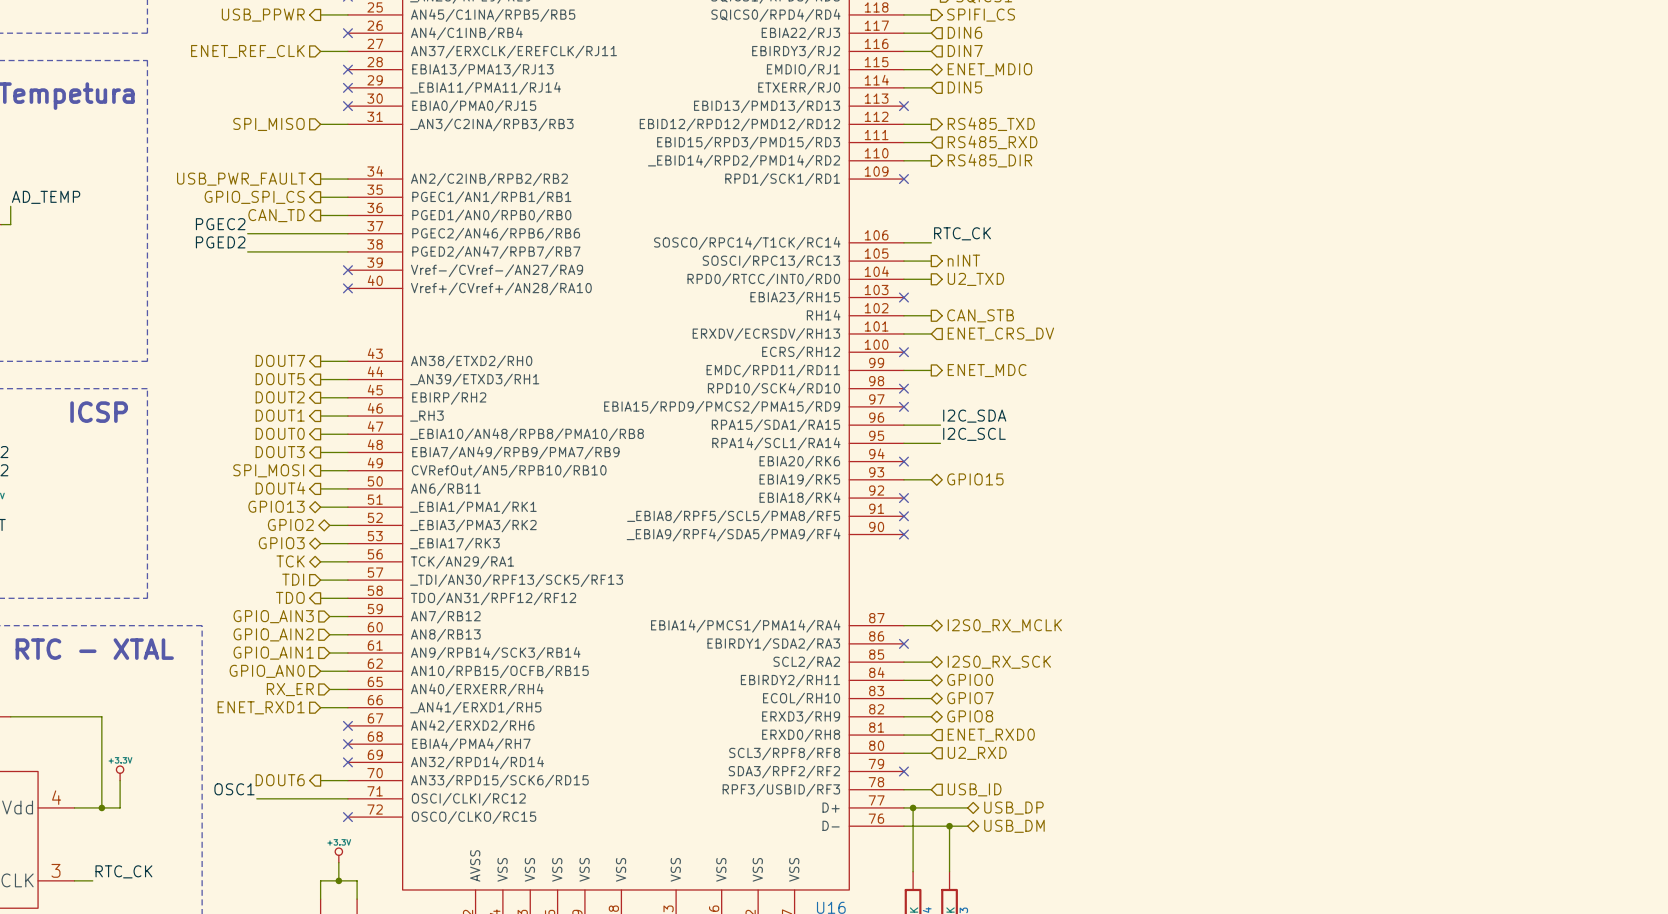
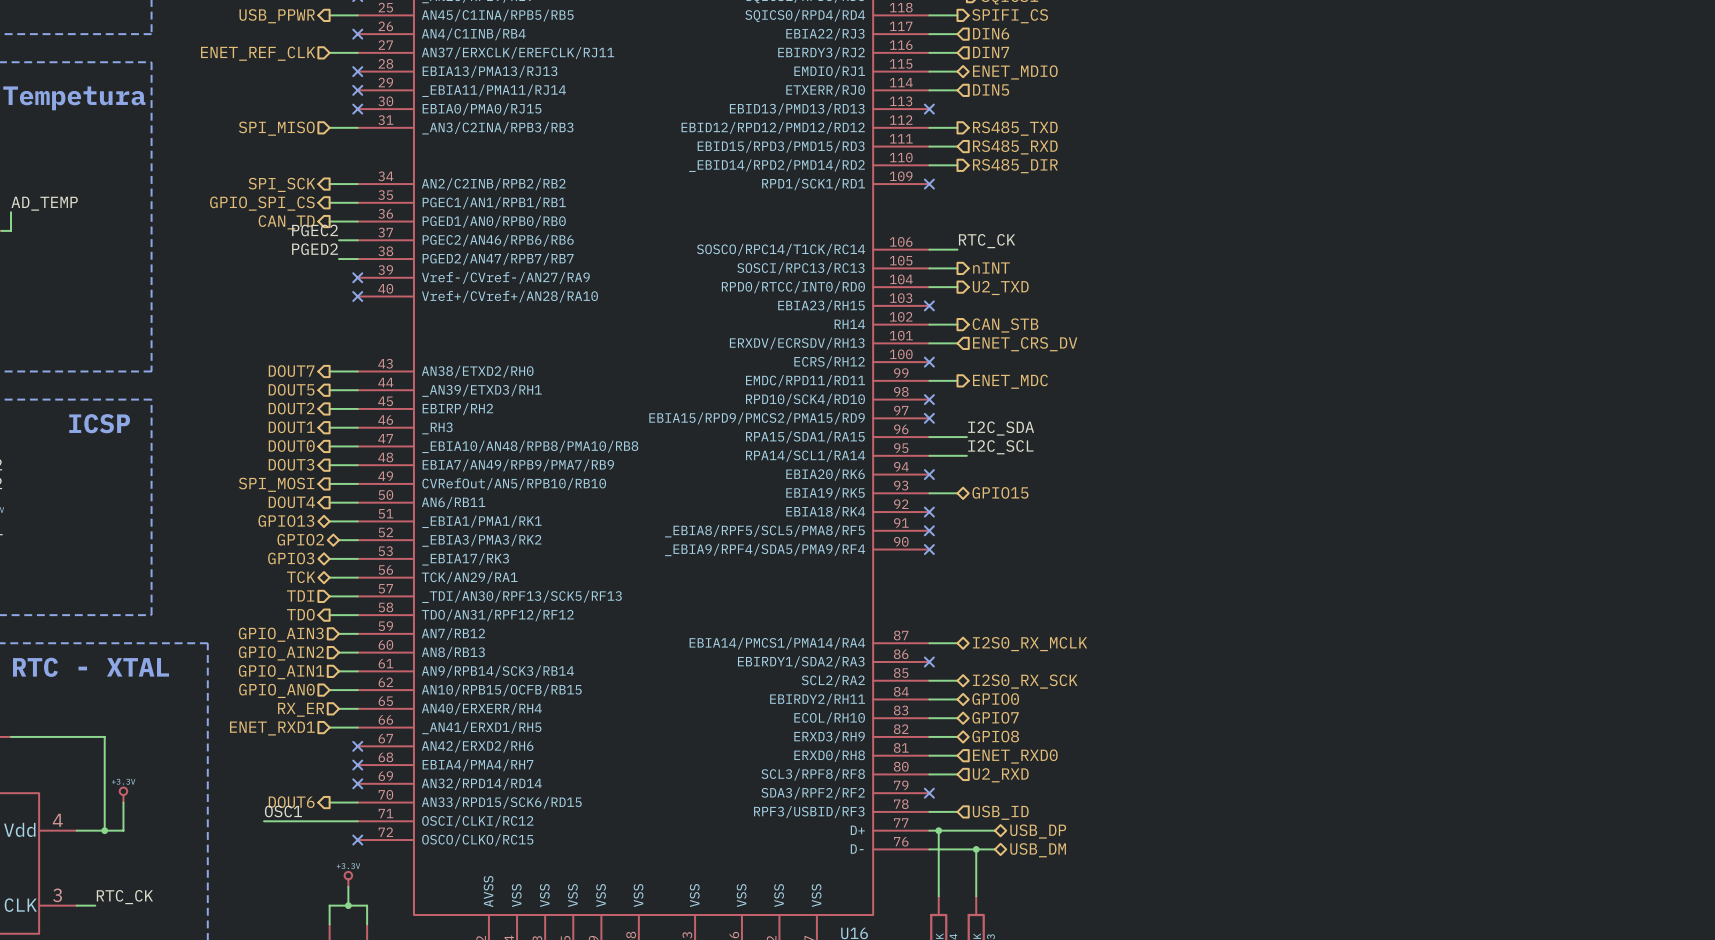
hierarchical label: USB_PWR_FAULT (241, 179) -> SPI_SCK (281, 184)
label position: PGEC2 (220, 224) -> PGEC2 (315, 230)
wire: (247, 233) (329, 233) -> none
label position: PGED2 (220, 242) -> PGED2 (315, 249)
wire: (247, 251) (329, 251) -> none
label position: OSC1 (234, 789) -> OSC1 (283, 811)

